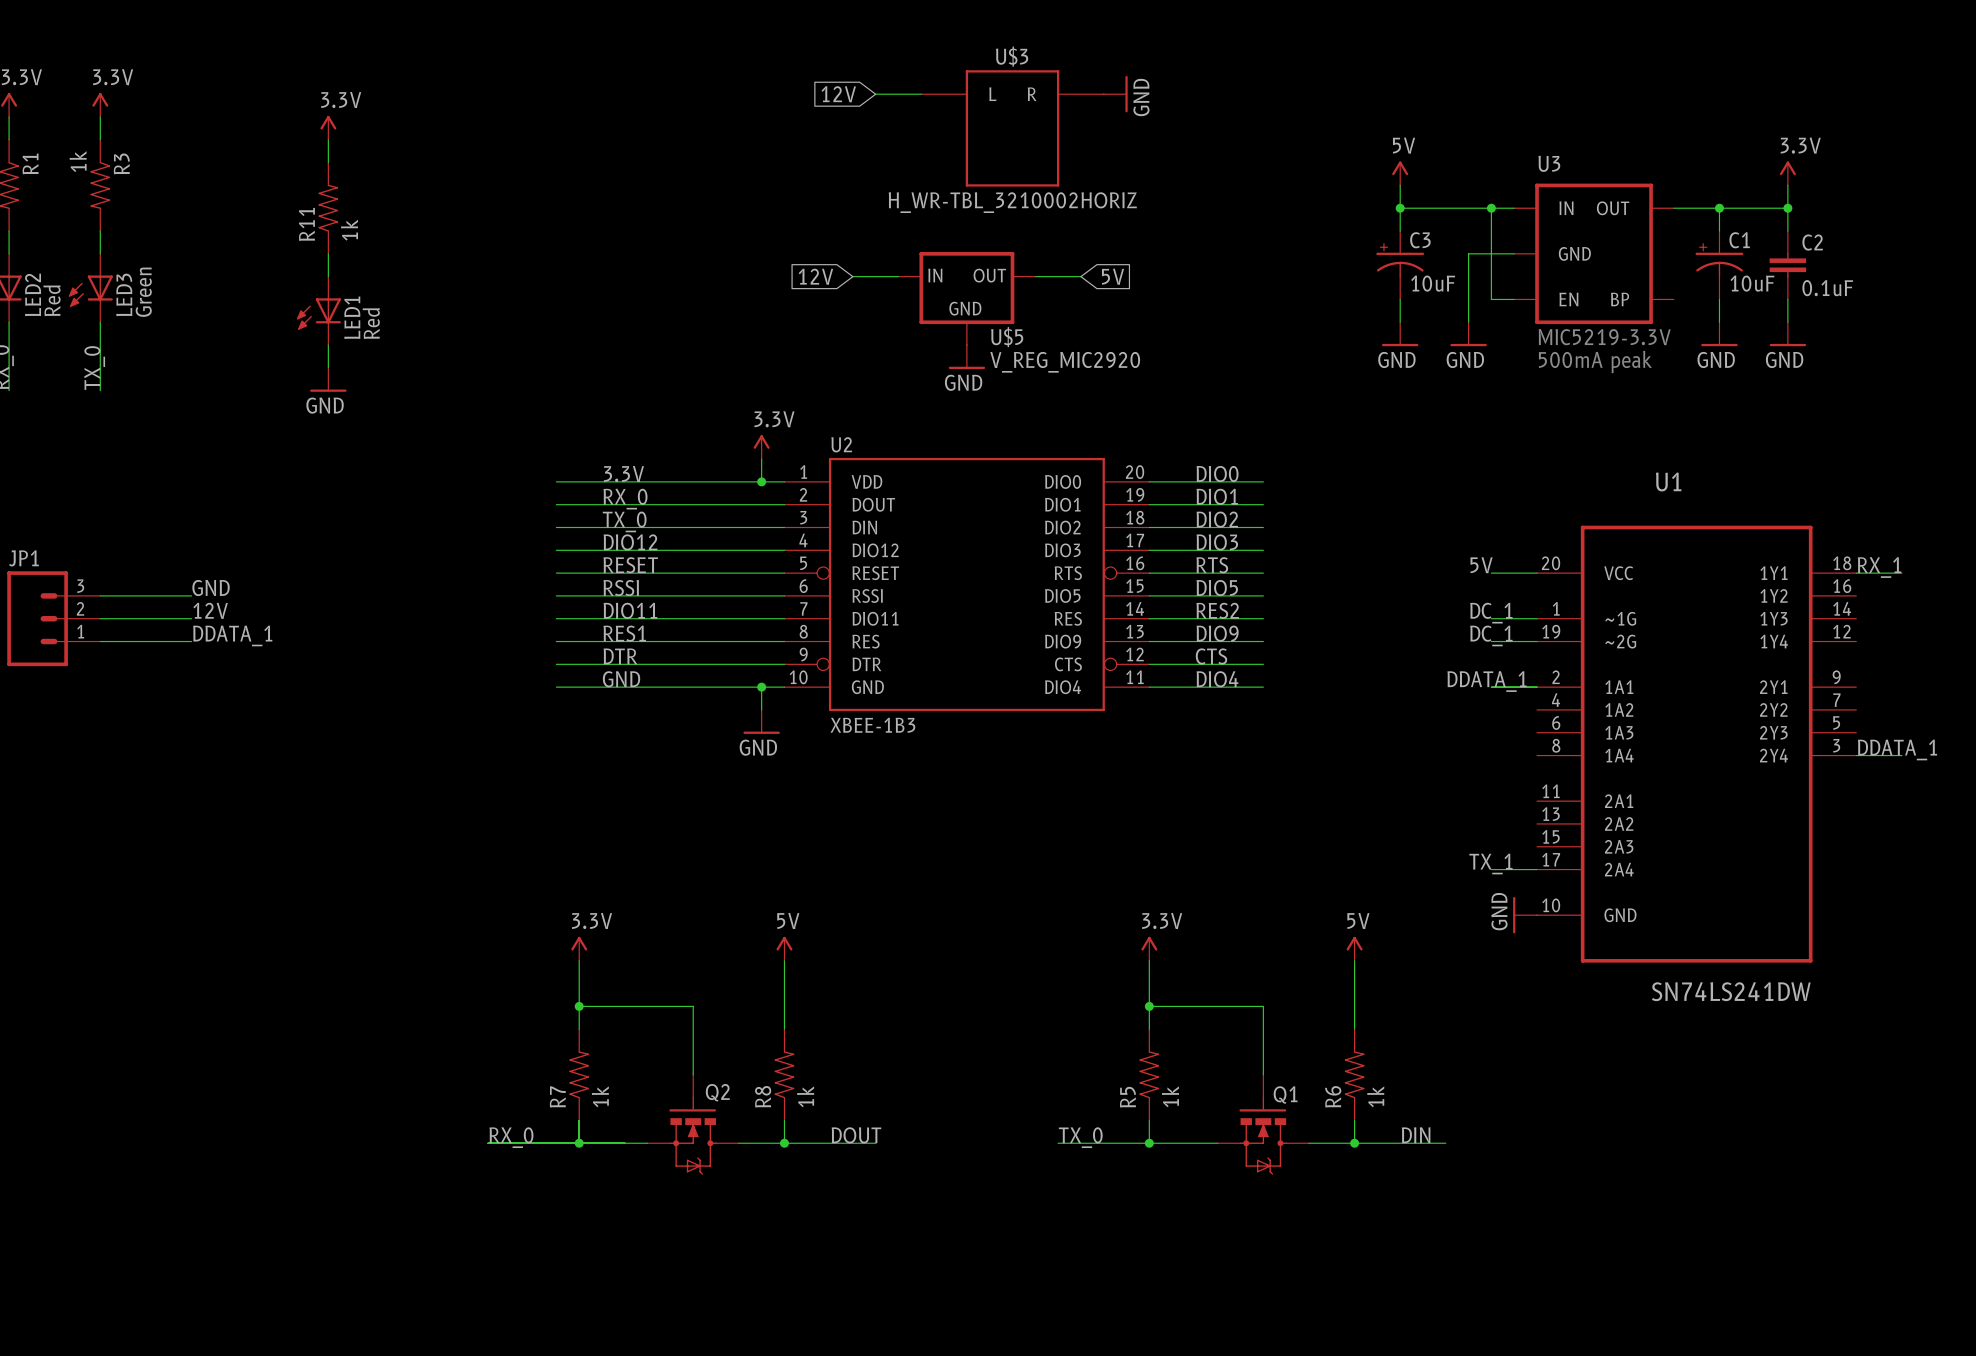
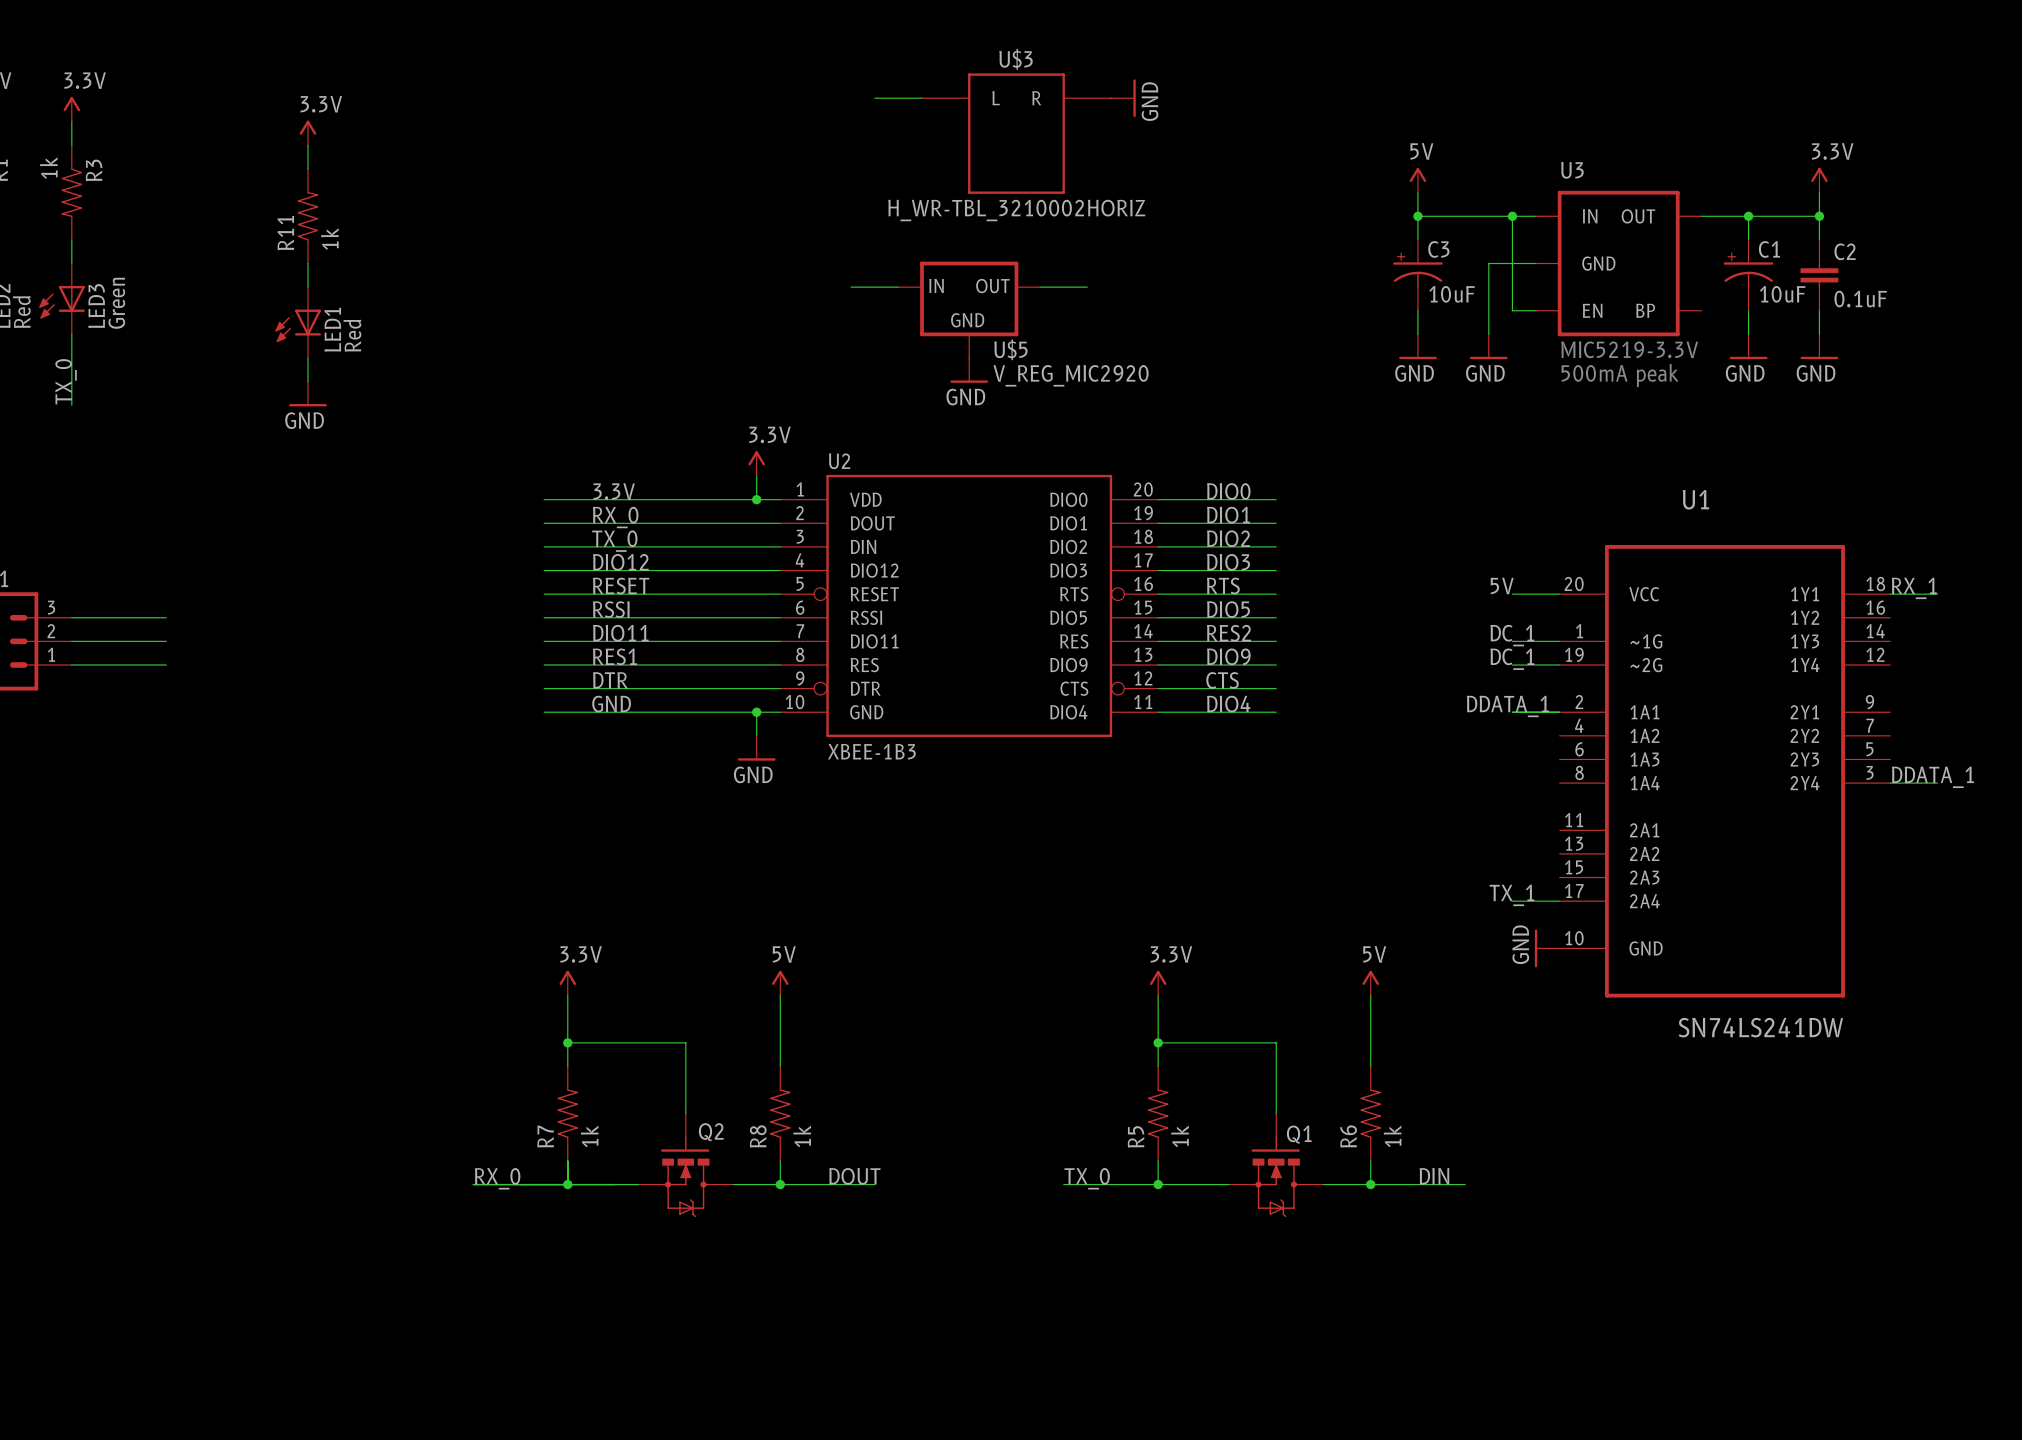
global label: 12V (838, 94) -> none
global label: 12V (815, 276) -> none
global label: 5V (1113, 276) -> none
label: GND (211, 588) -> none
label: 12V (210, 610) -> none
label: DDATA_1 (232, 635) -> none

